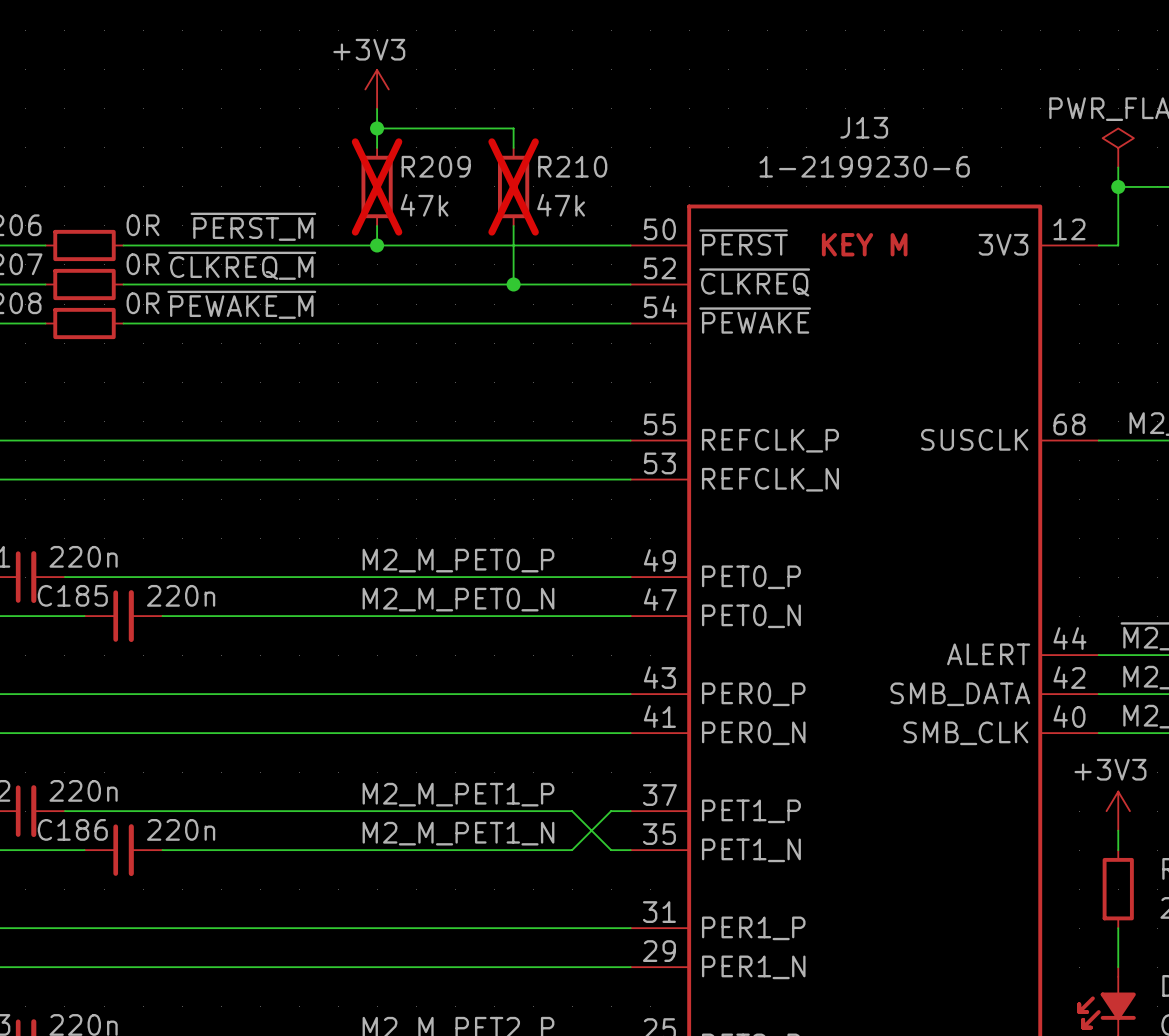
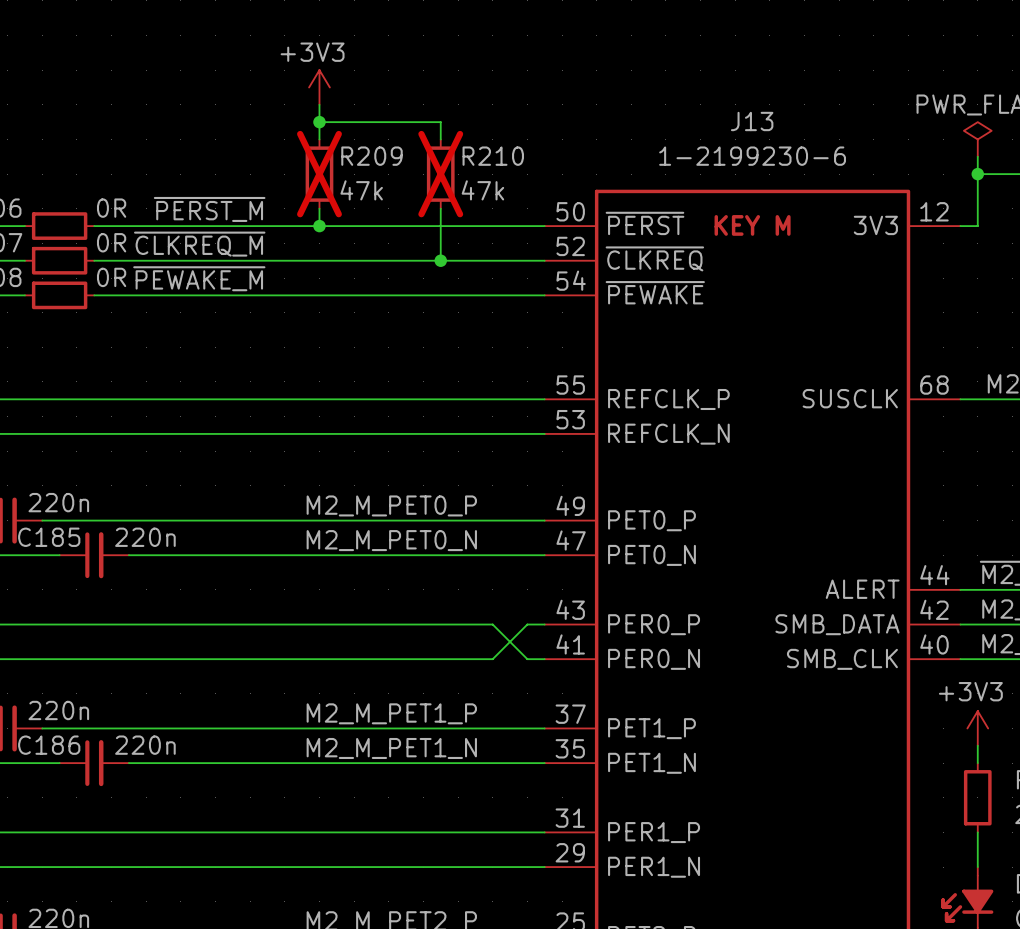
wire: (572, 694) (611, 694) -> (492, 624) (527, 659)
wire: (572, 733) (611, 733) -> (492, 659) (527, 624)
wire: (572, 811) (611, 850) -> (492, 728) (527, 728)
wire: (611, 811) (572, 850) -> (527, 763) (492, 763)

